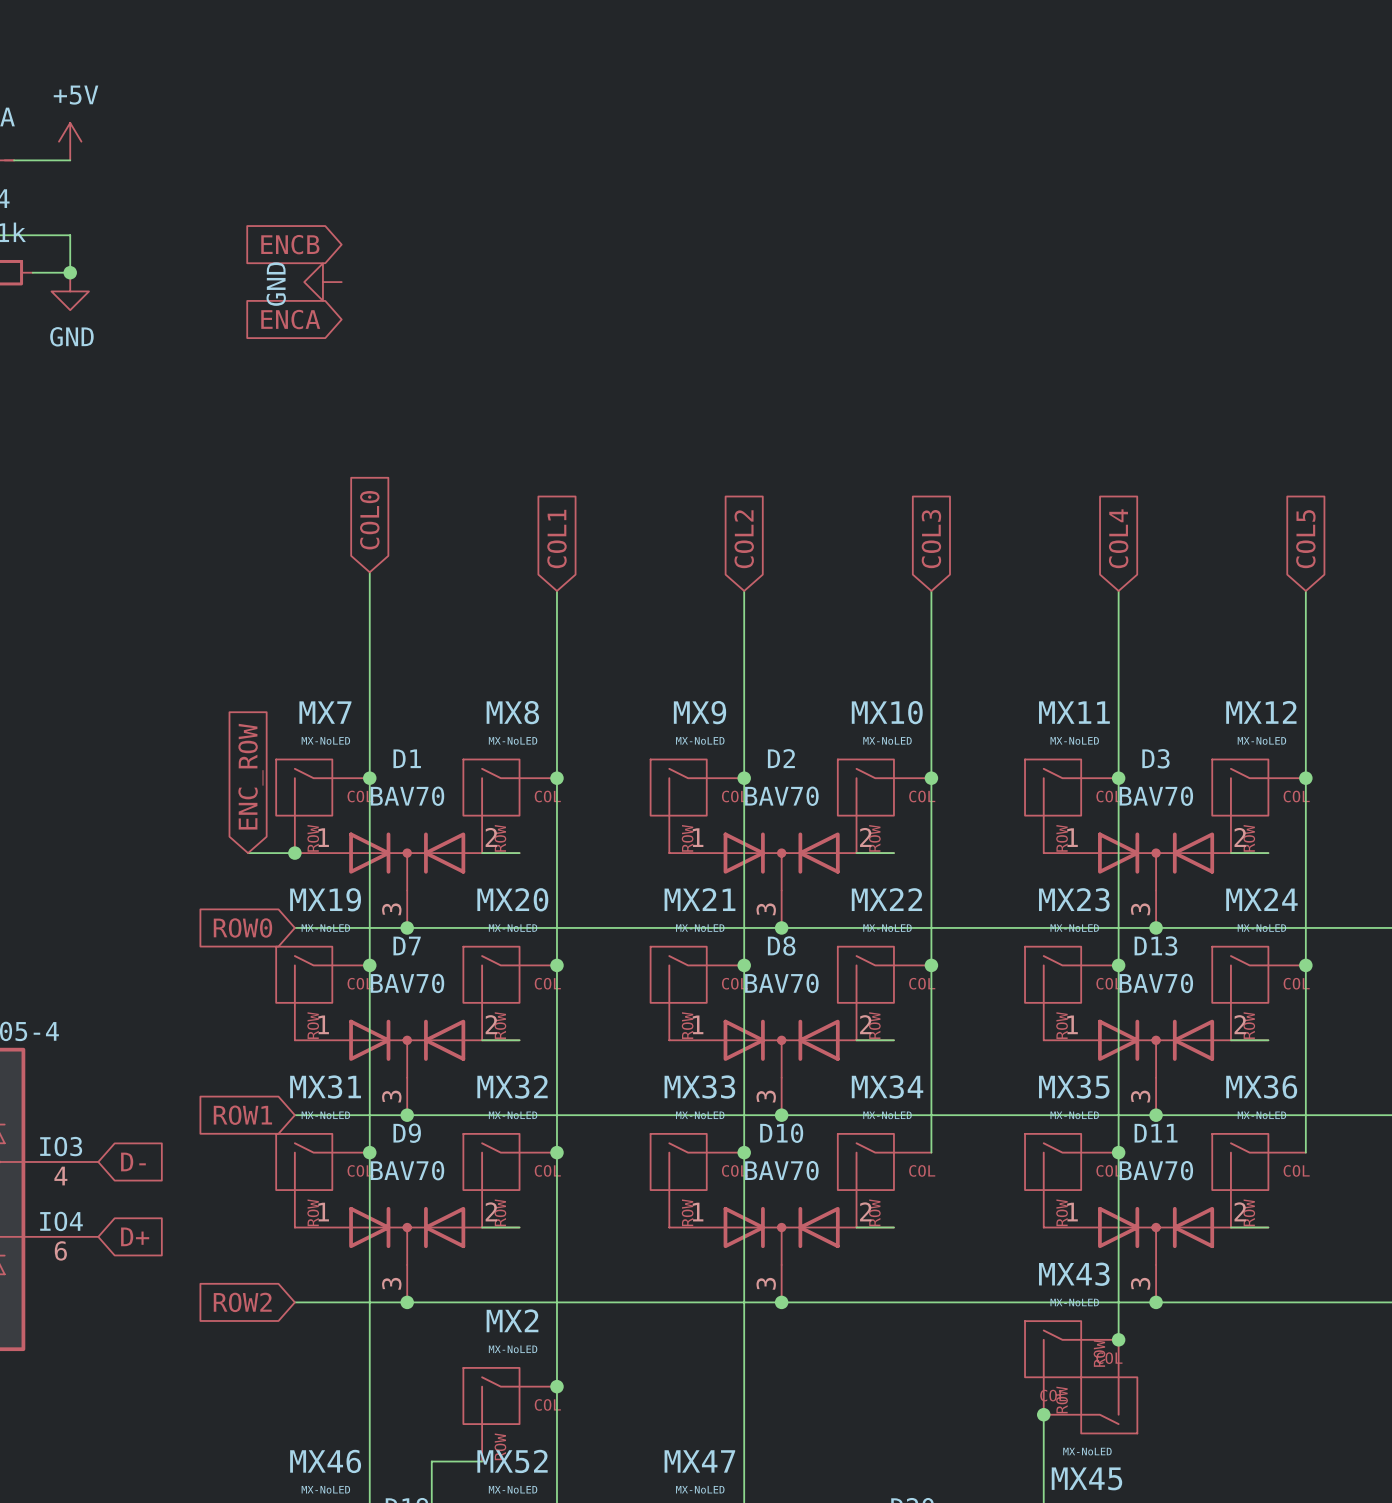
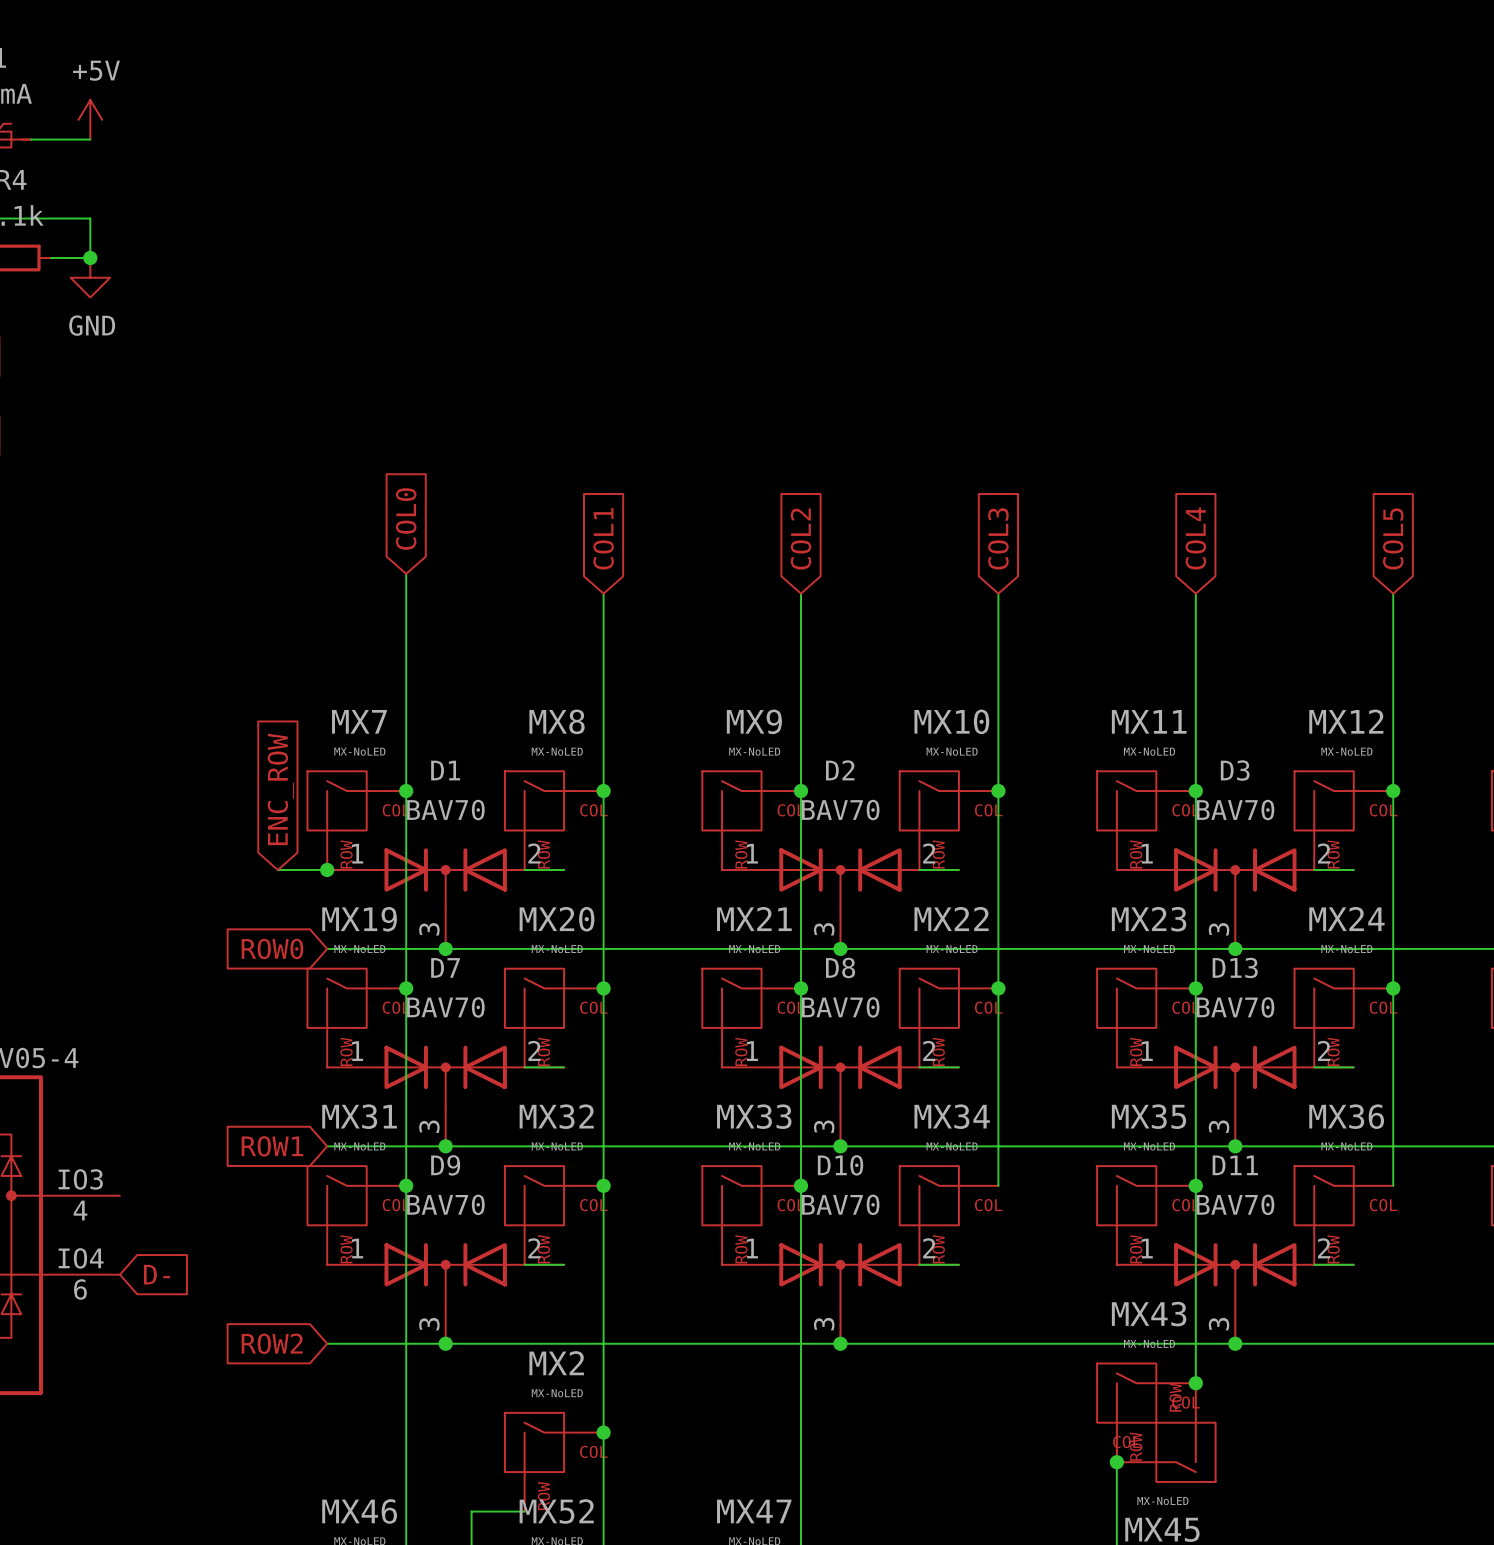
global label: ENCB (290, 244) -> none
power symbol: GND (322, 282) -> none
global label: ENCA (290, 319) -> none
global label: D- (133, 1161) -> none
global label: D+ (135, 1236) -> D- (157, 1274)

